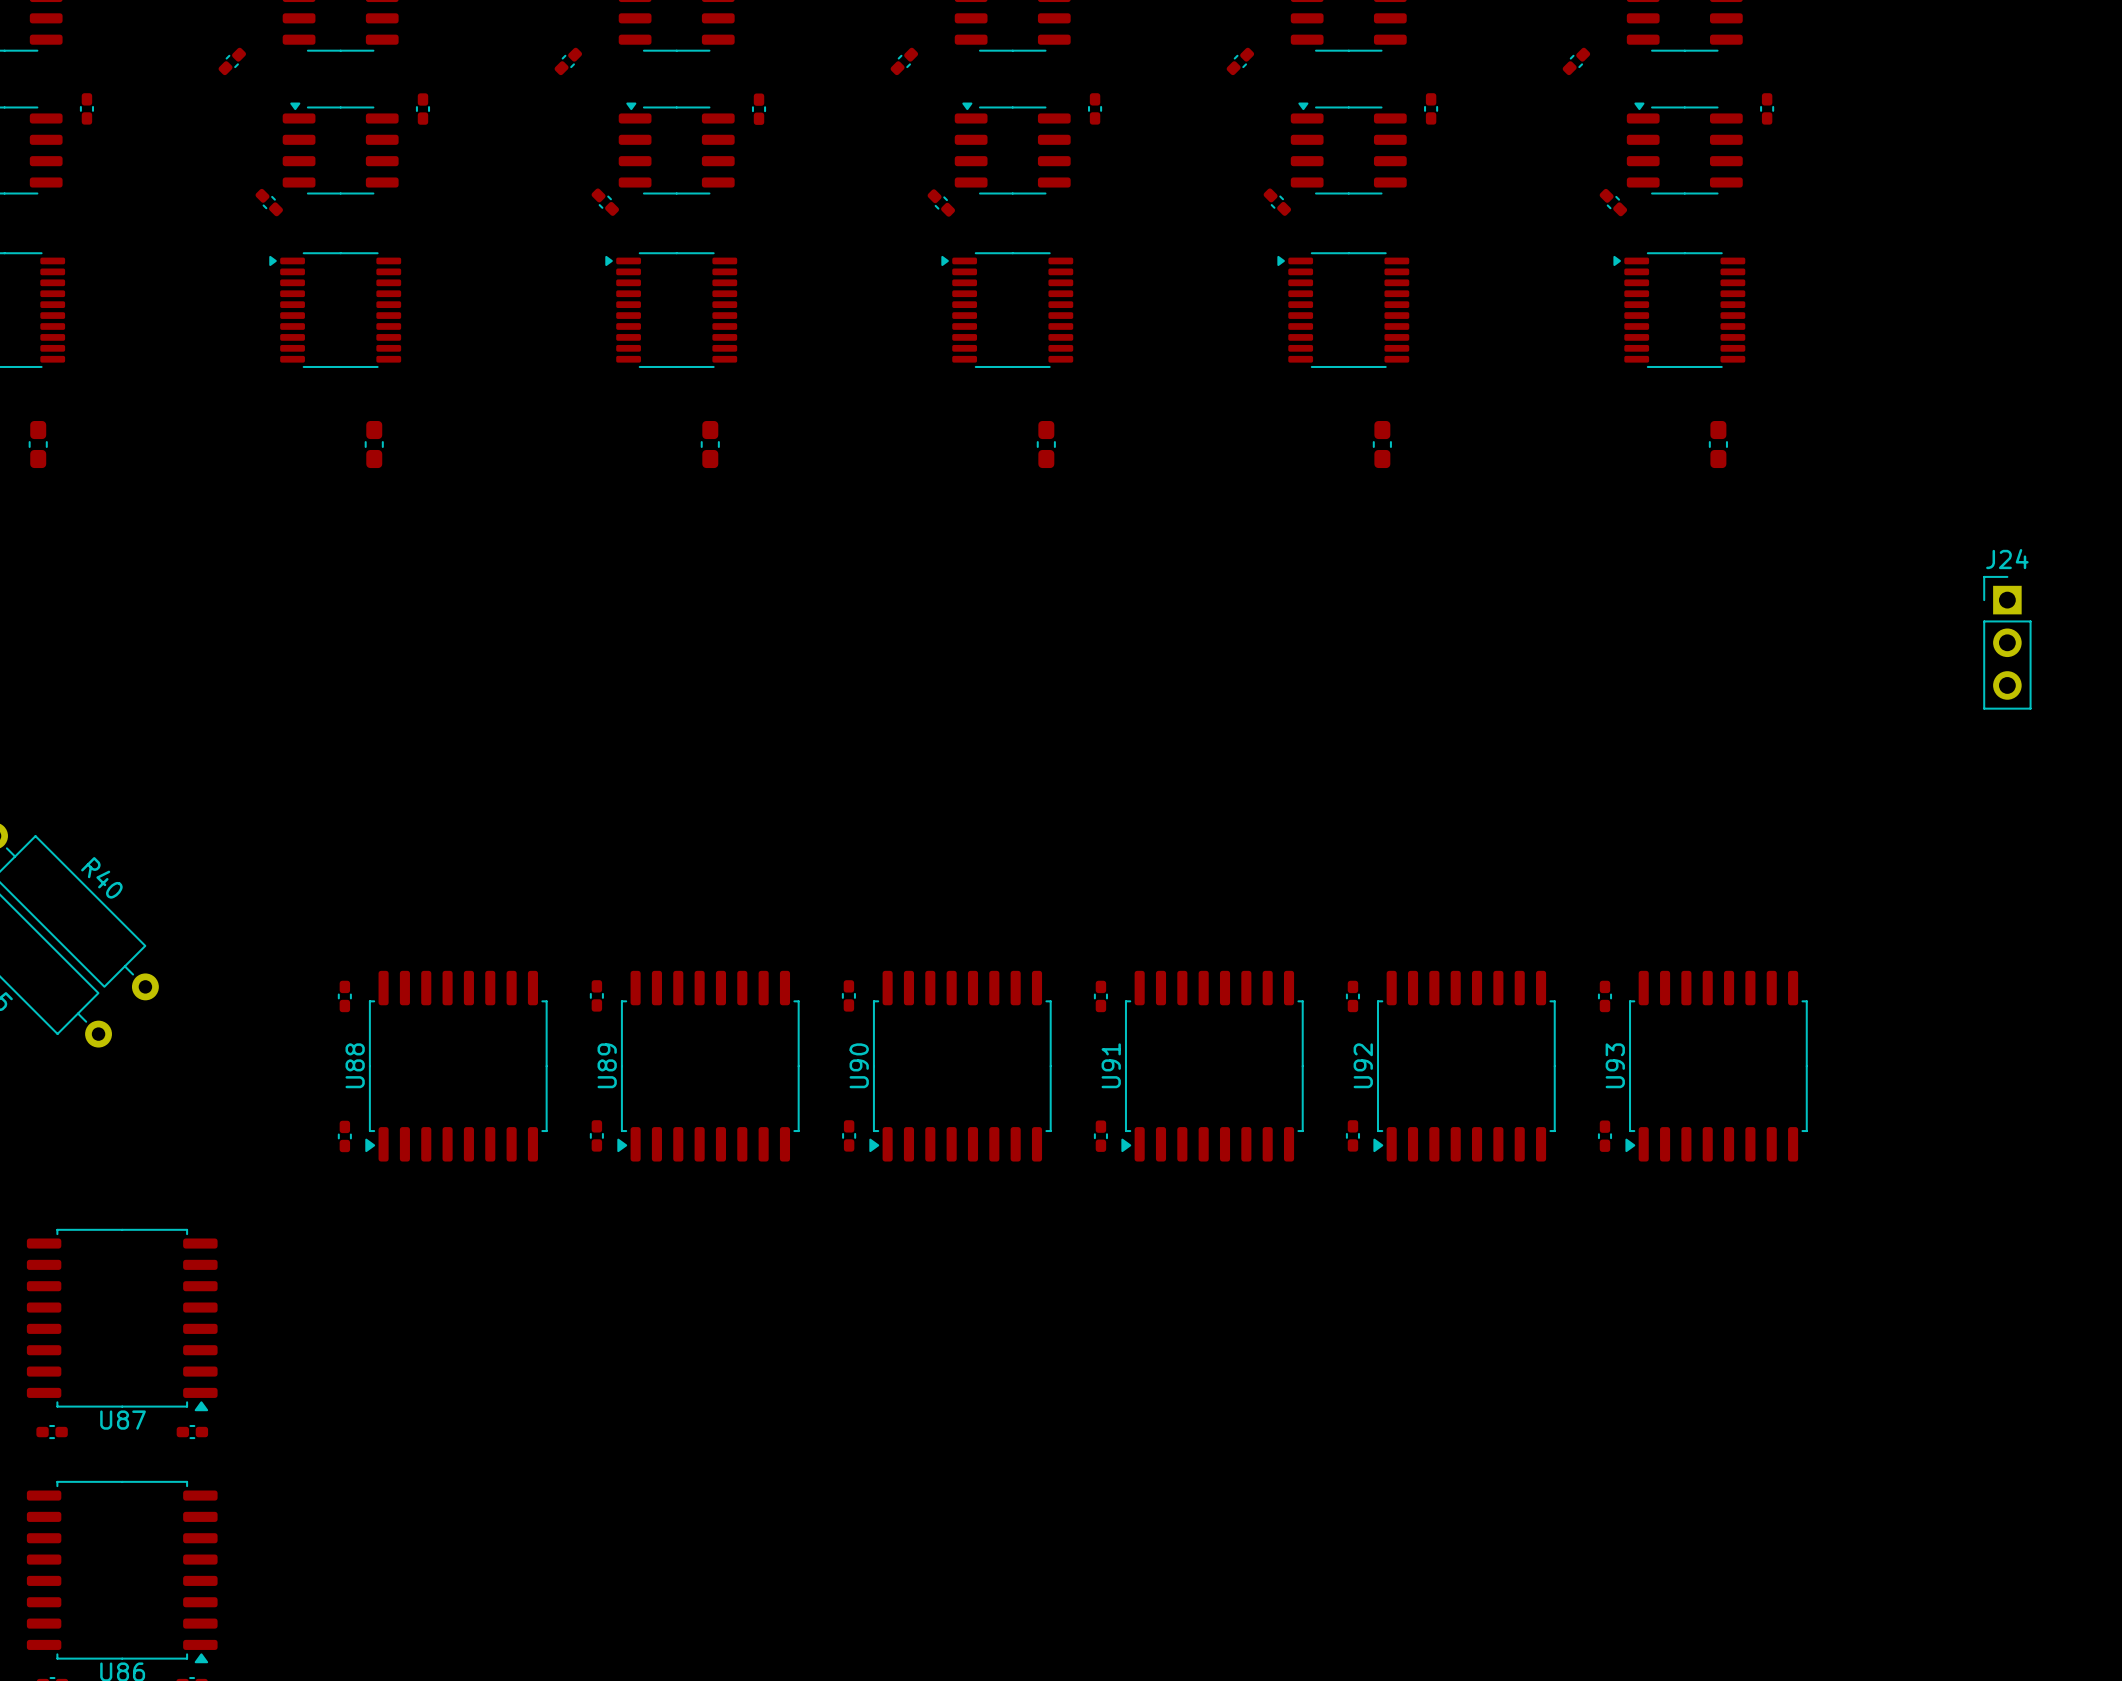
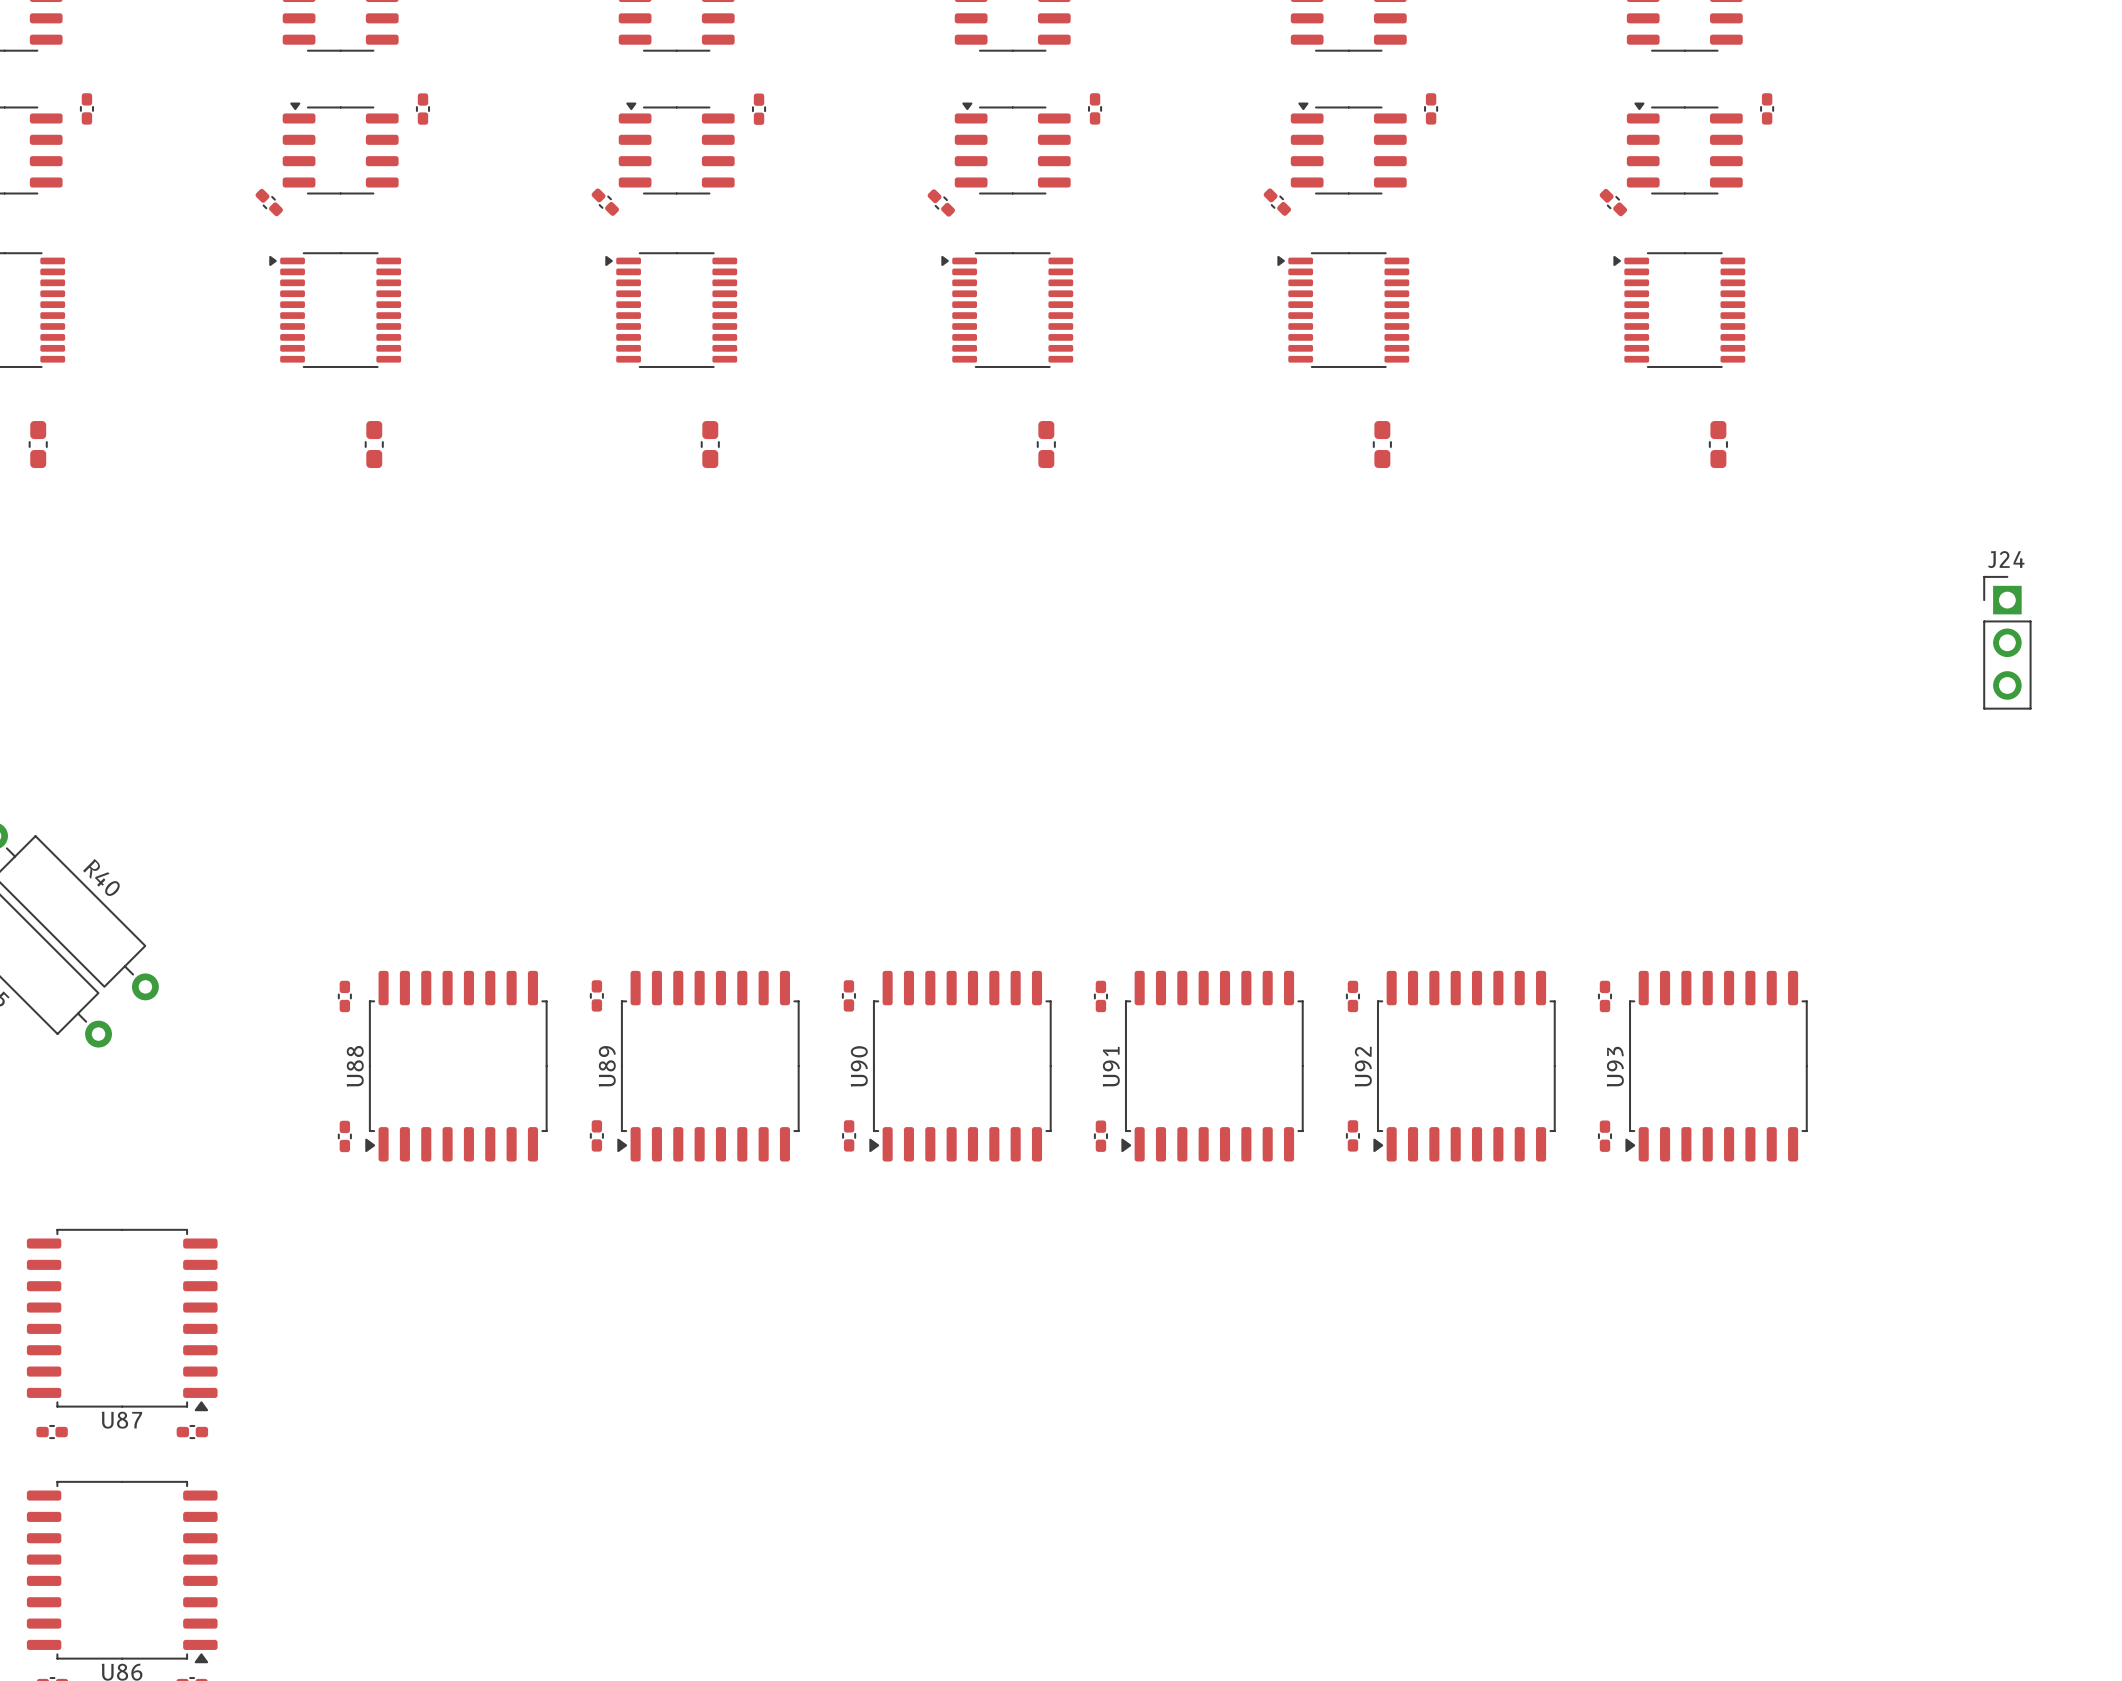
part: (232, 61) -> none
part: (568, 61) -> none
part: (904, 61) -> none
part: (1240, 61) -> none
part: (1576, 61) -> none

